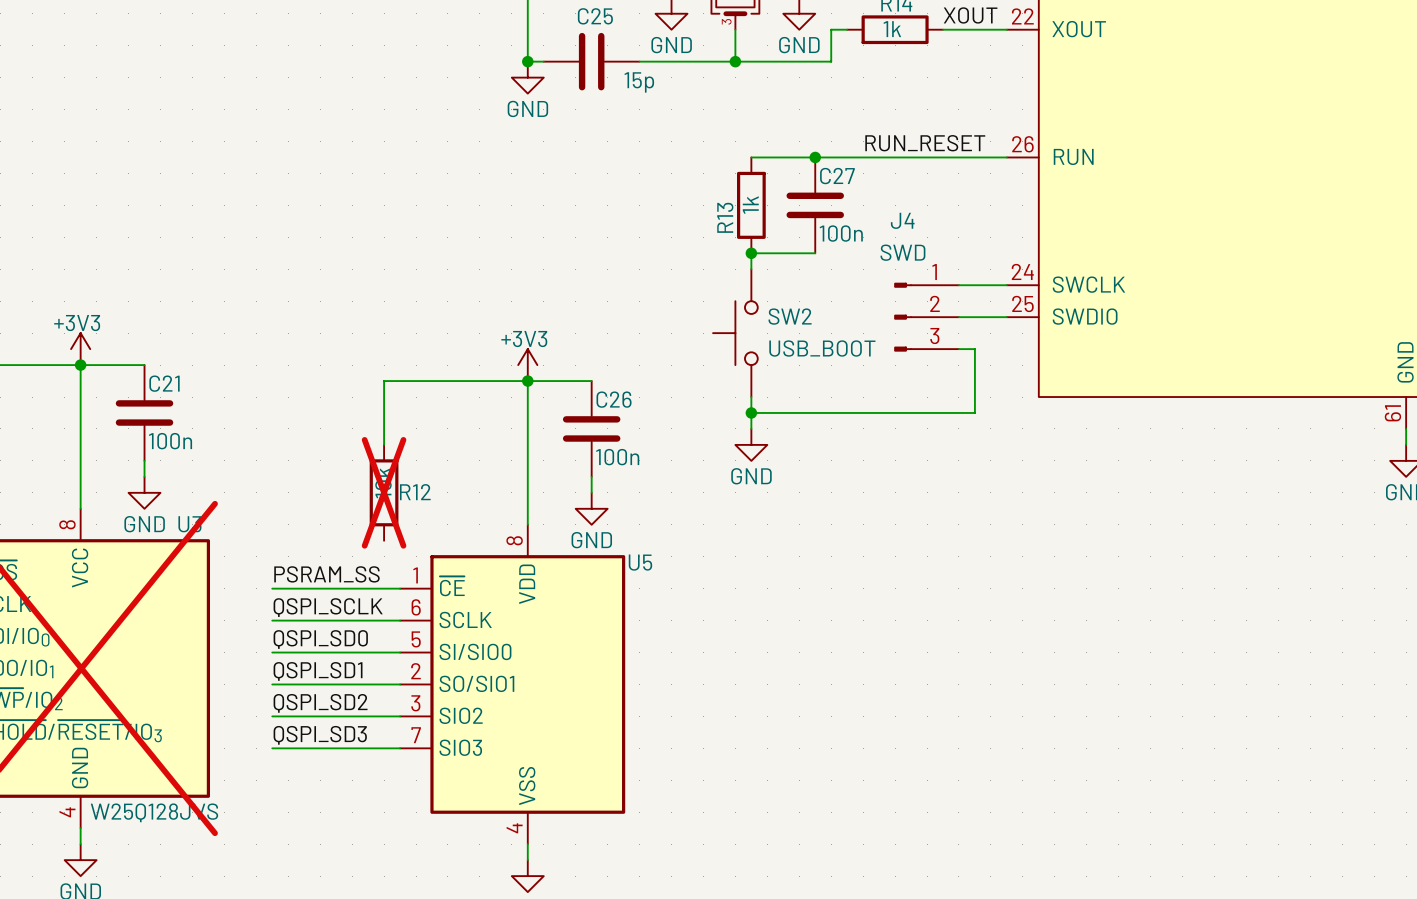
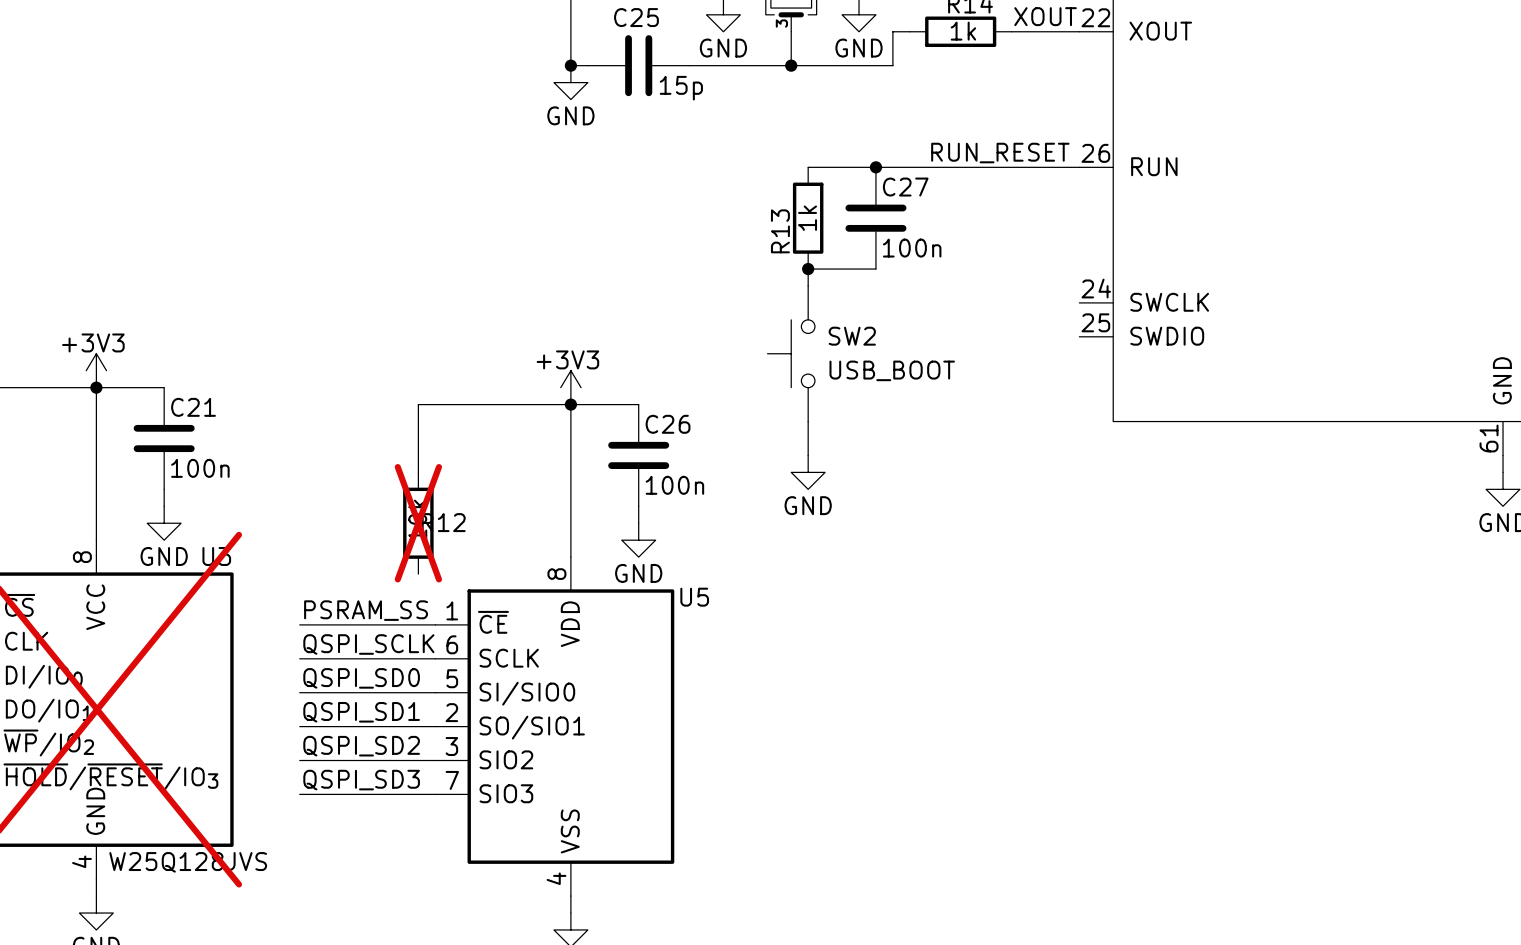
wire: (958, 285) (1006, 285) -> none
J4: SWD (926, 317) -> none
wire: (958, 317) (1006, 317) -> none
wire: (958, 349) (974, 349) (974, 412) (751, 412) -> none
junction: (751, 412) -> none

